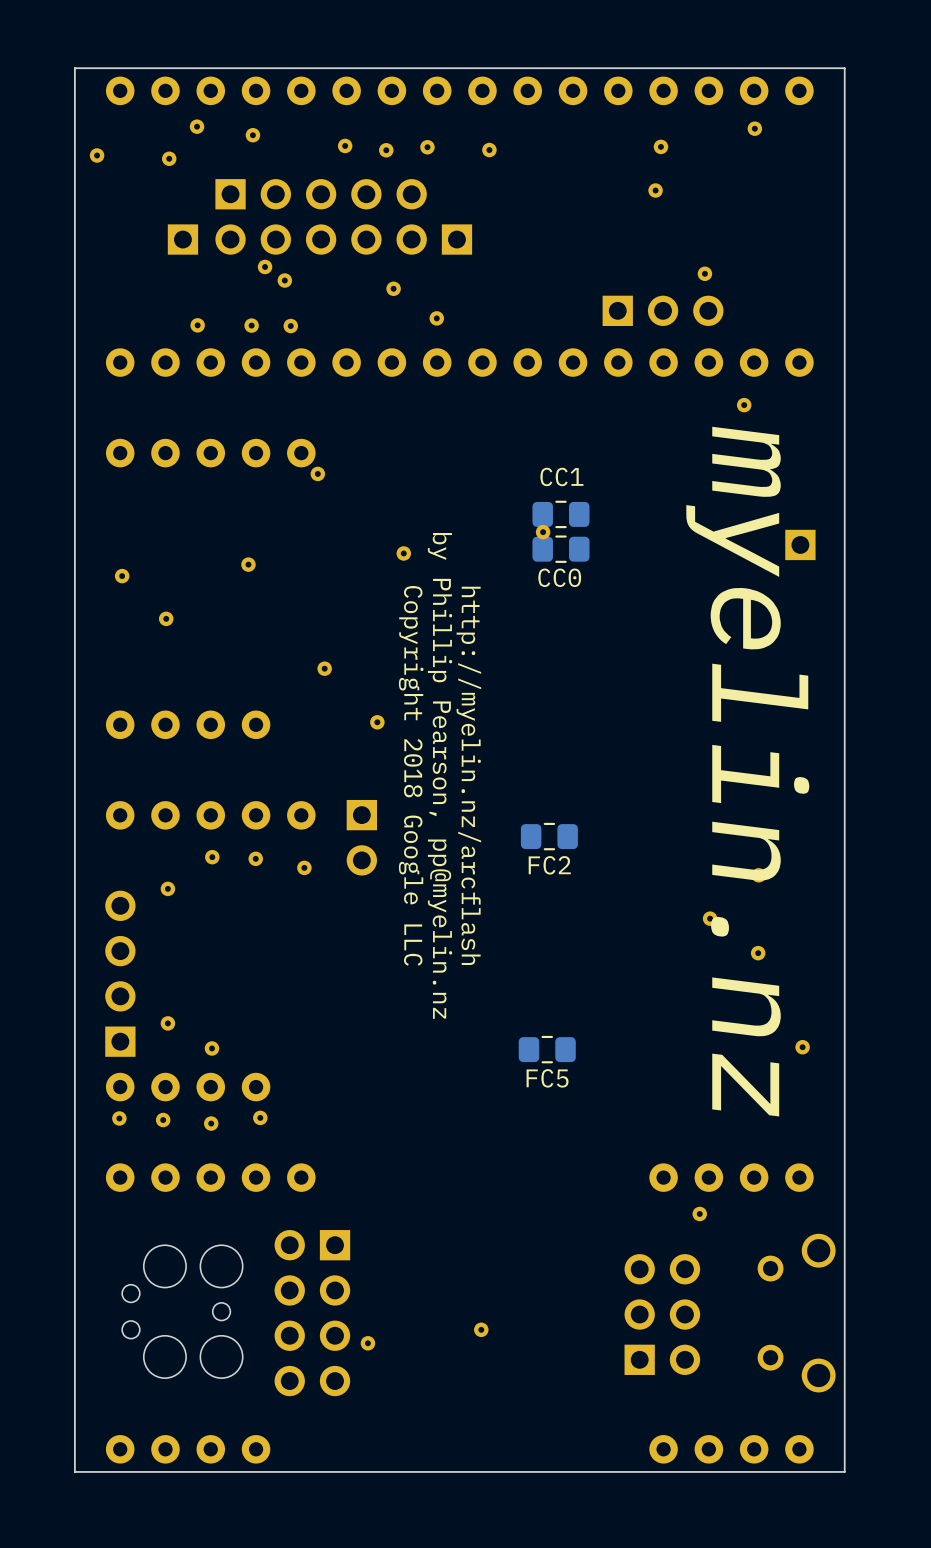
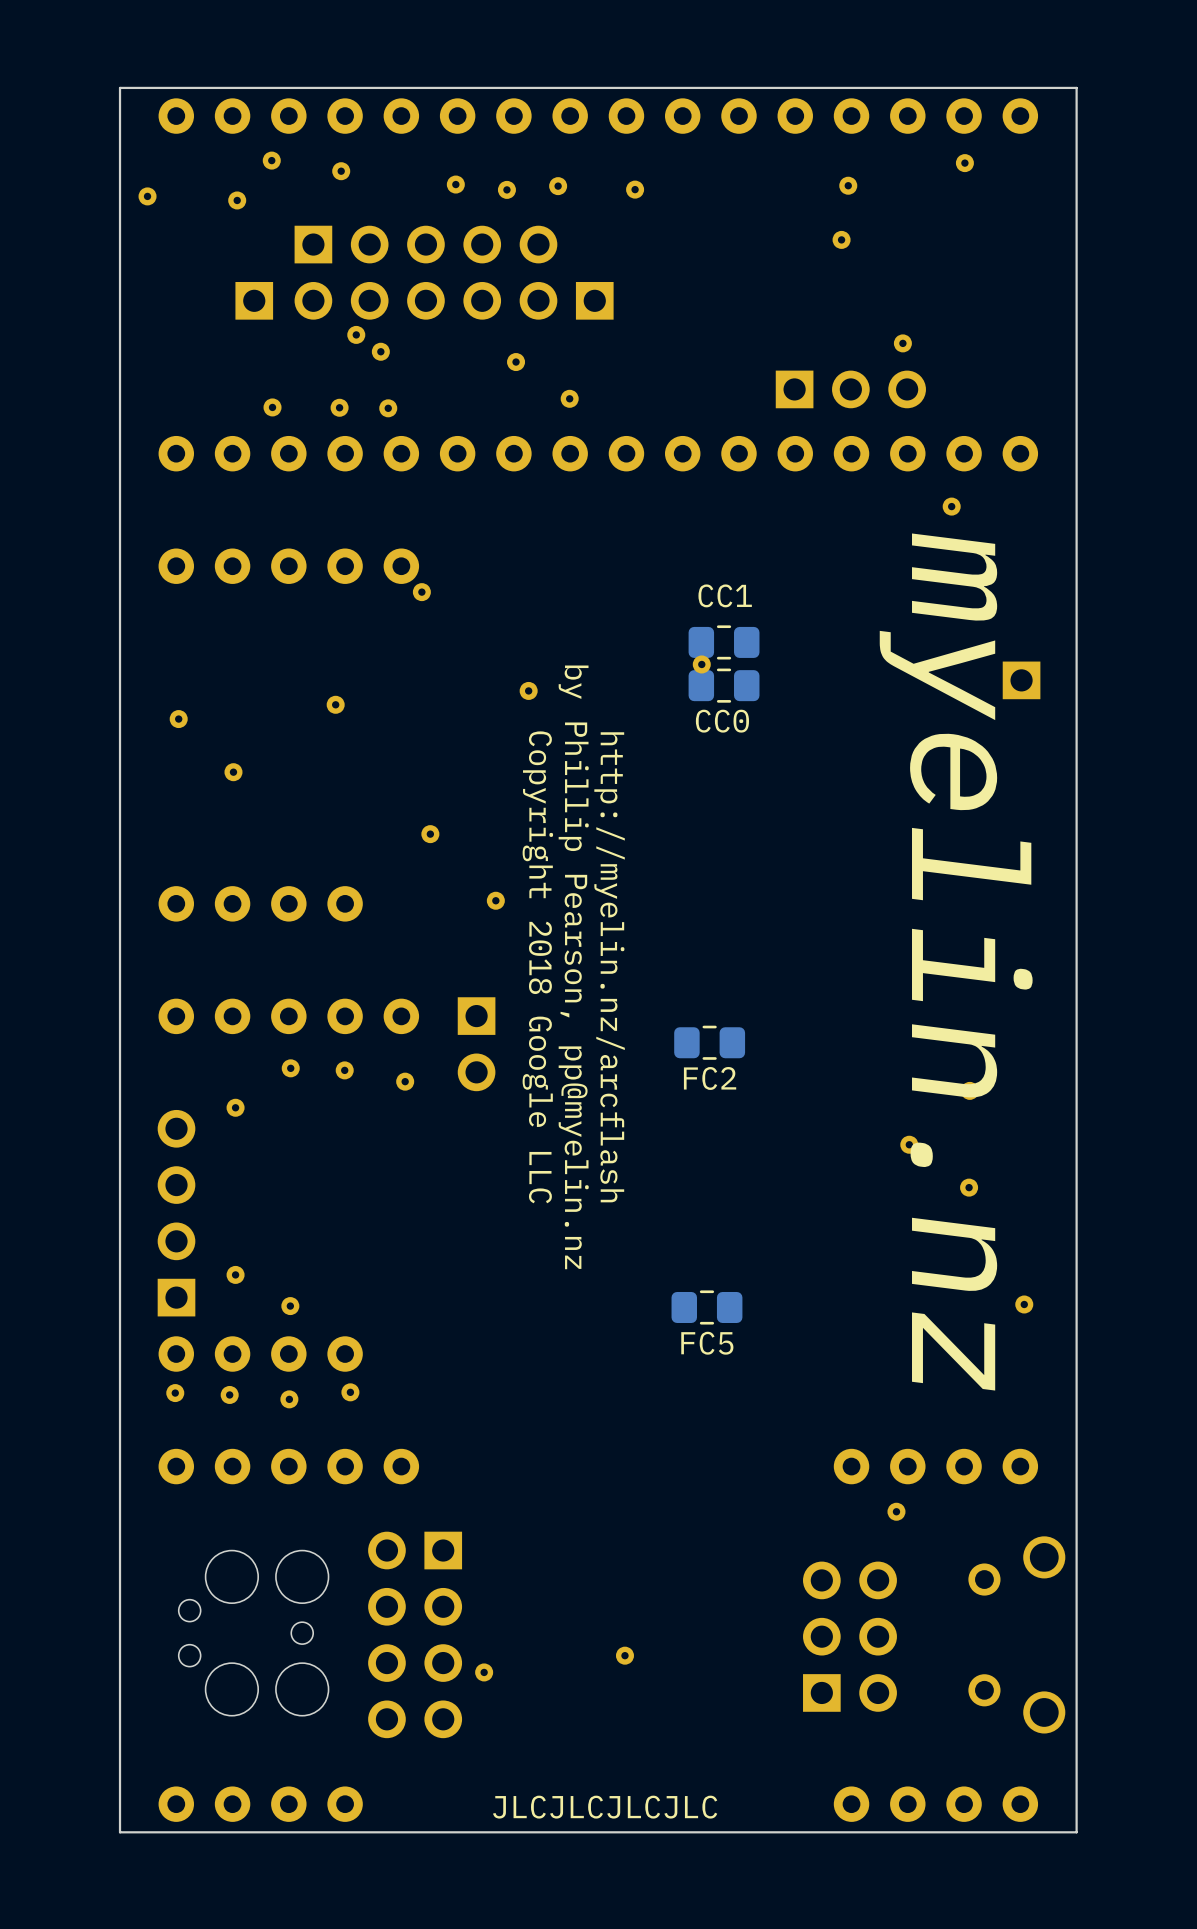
text: none -> JLCJLCJLCJLC (605, 1807)

